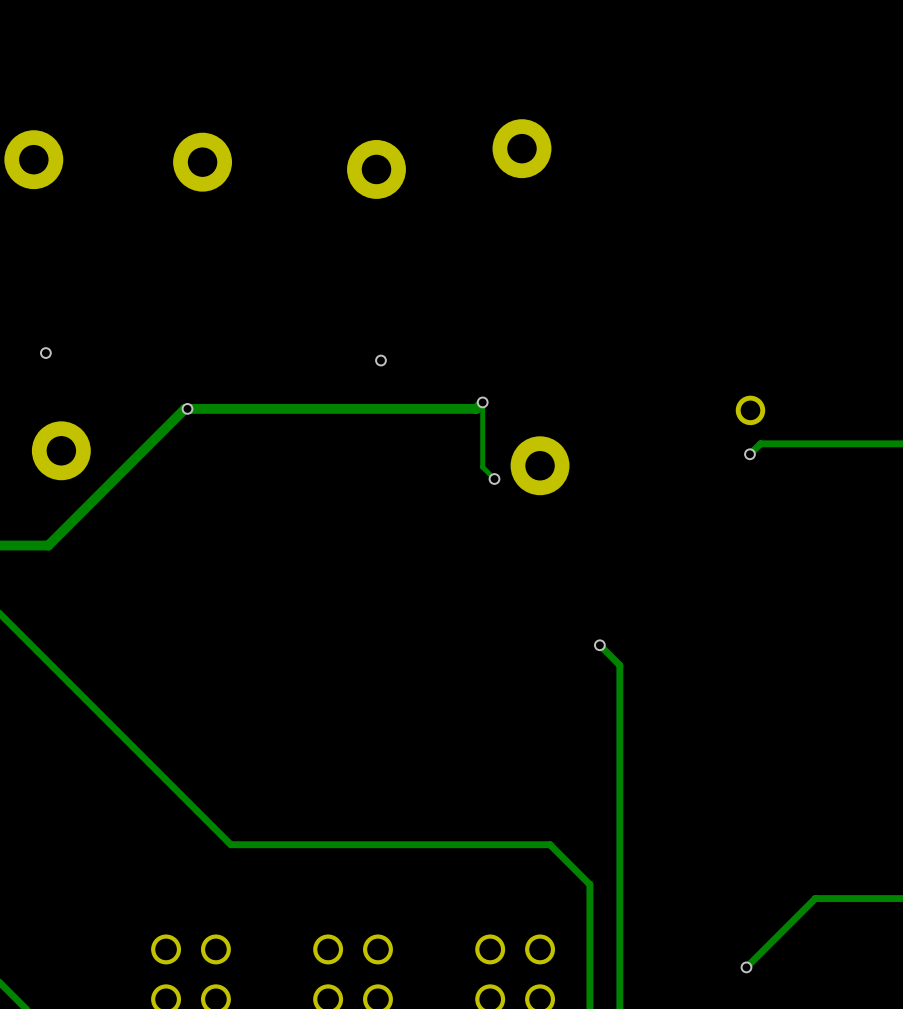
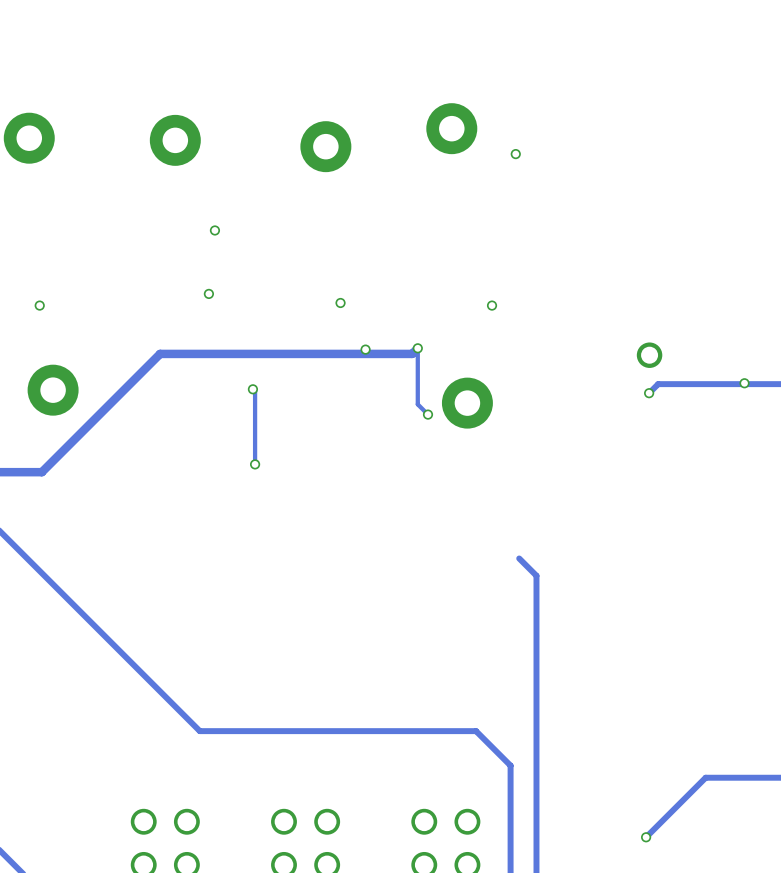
via: none -> (515, 154)
via: none -> (214, 230)
via: none -> (208, 293)
via: none -> (492, 305)
via position: (380, 360) -> (340, 302)
via: none -> (365, 349)
via: (187, 408) -> none
via: none -> (744, 383)
track: none -> (252, 389) (255, 391) (255, 464)
via: none -> (252, 389)
via: none -> (255, 464)
via: (599, 645) -> none

